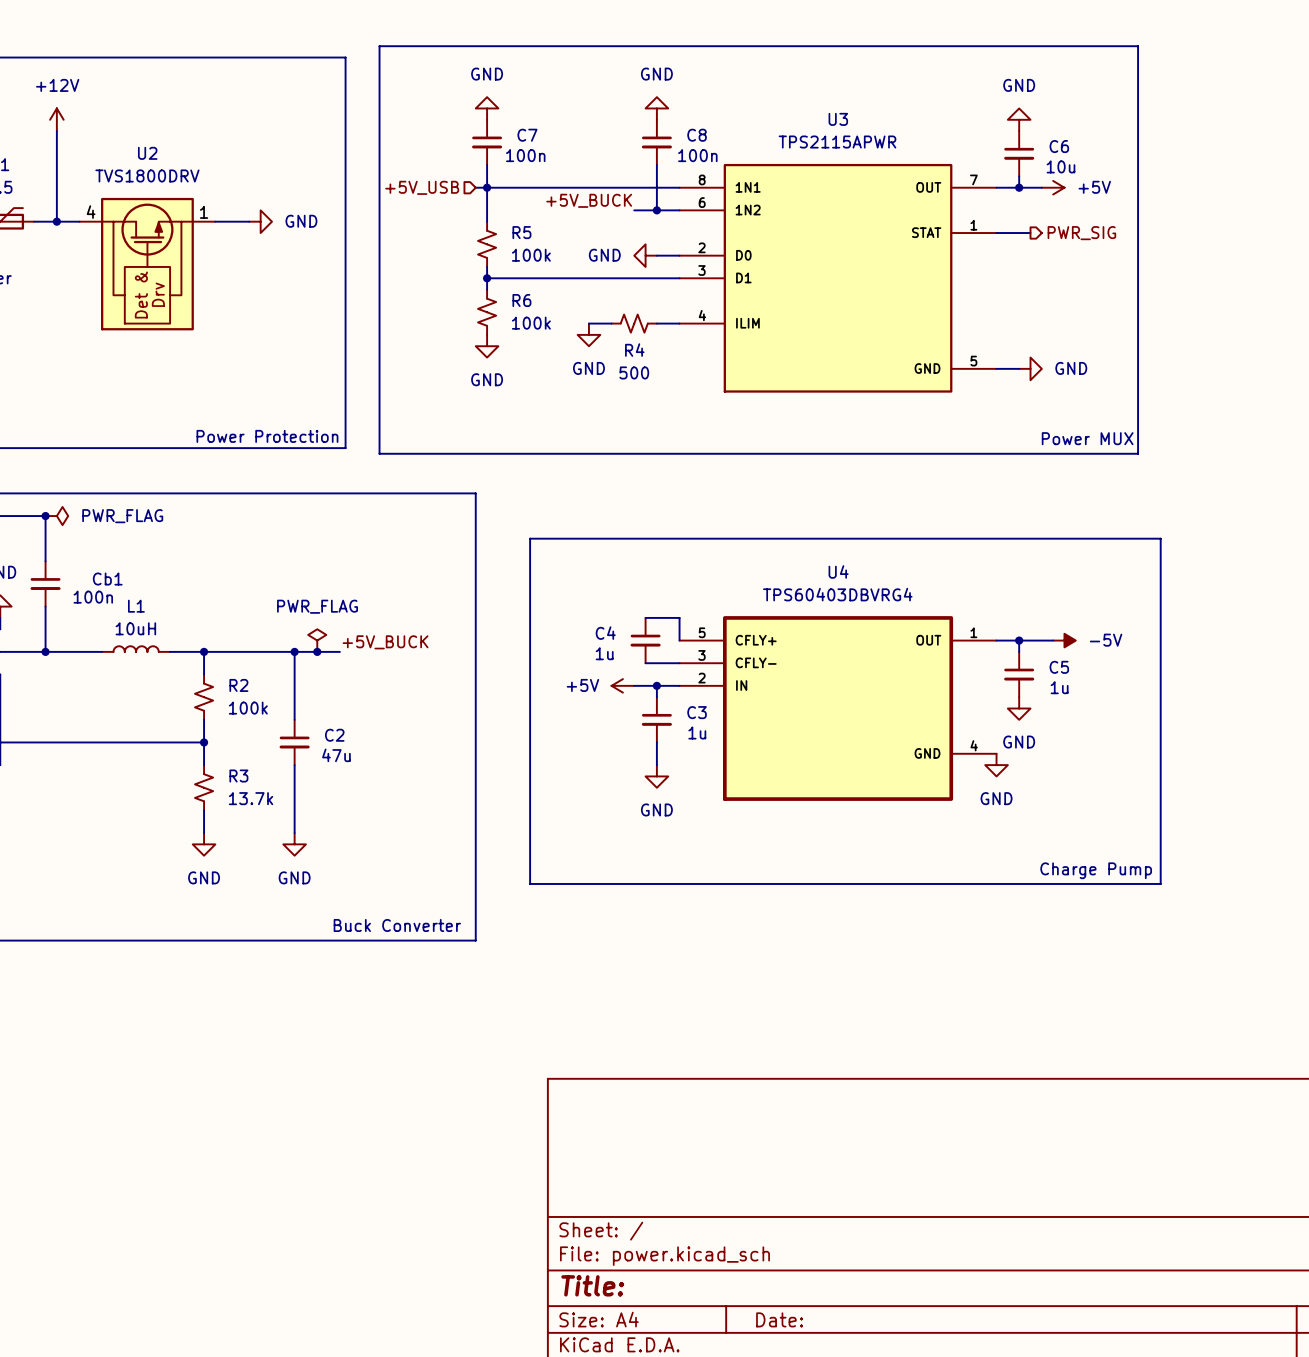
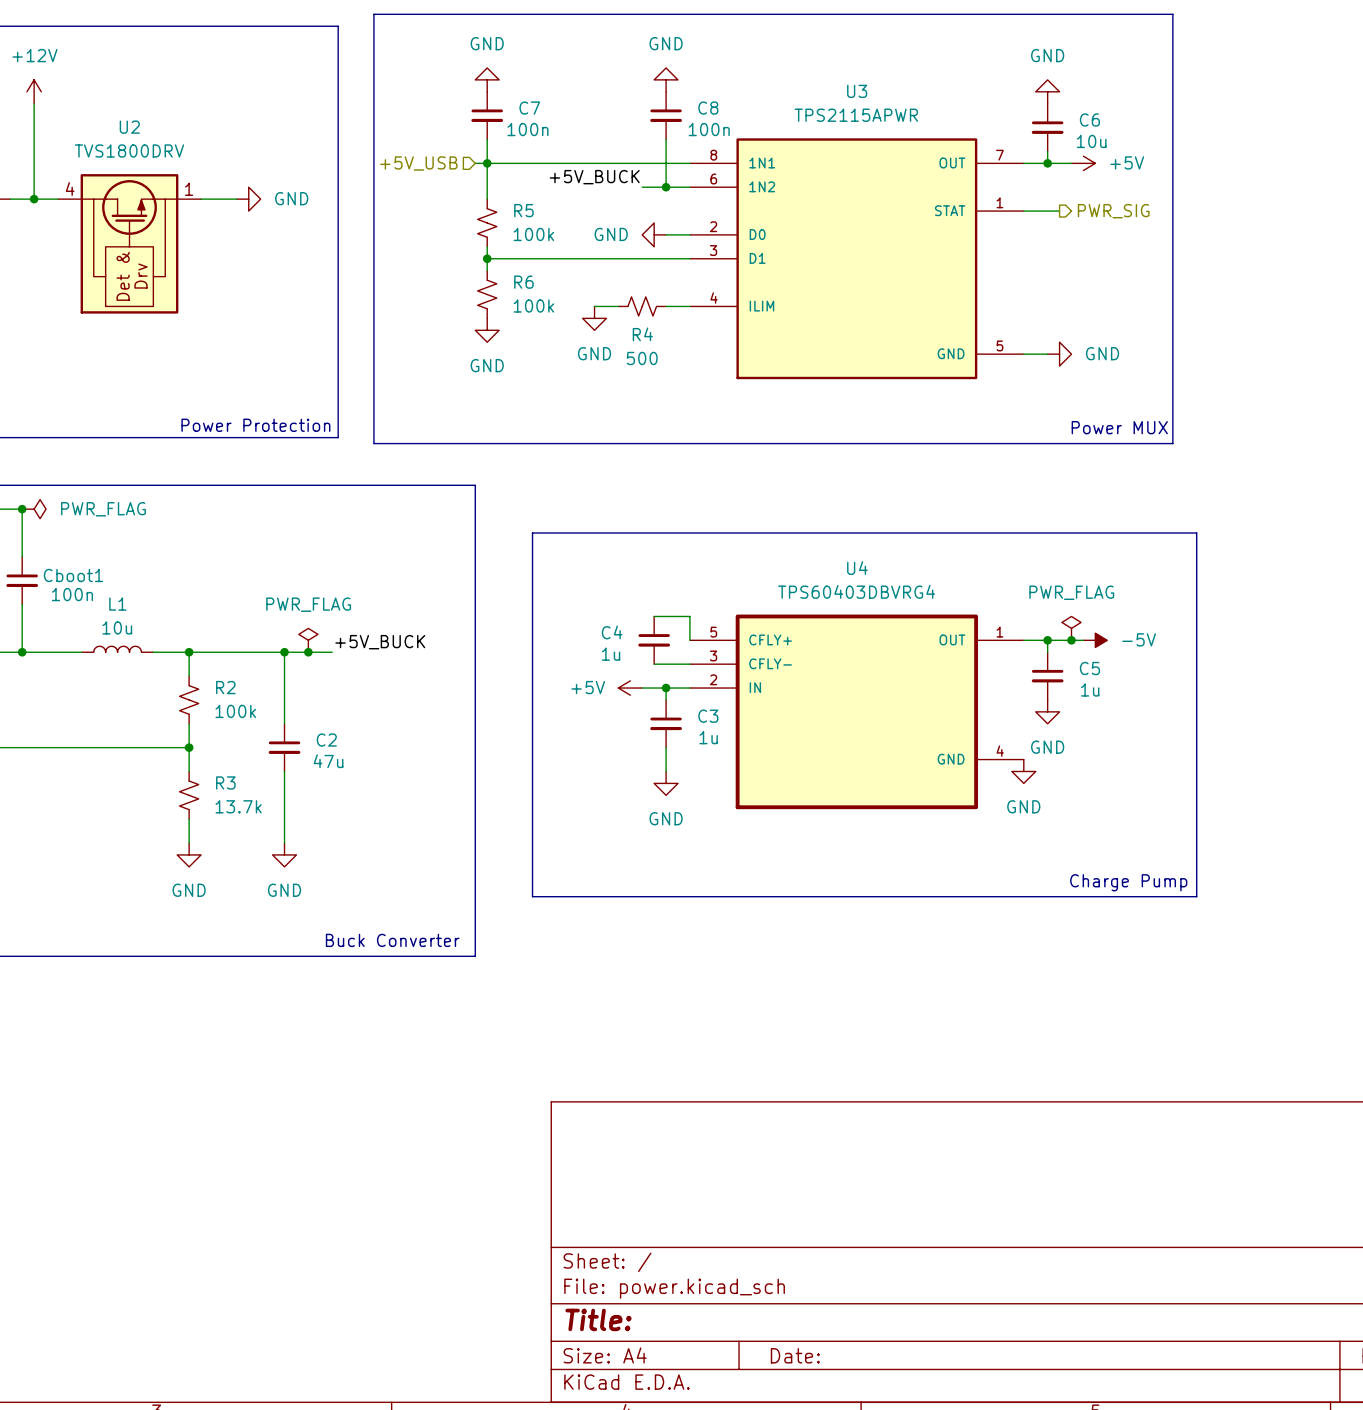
Cb1 name: Cb1 (107, 579) -> Cboot1 (73, 575)
L1 value: 10uH (135, 628) -> 10u (117, 627)
power symbol: none -> PWR_FLAG (1071, 628)
junction: none -> (1071, 640)

